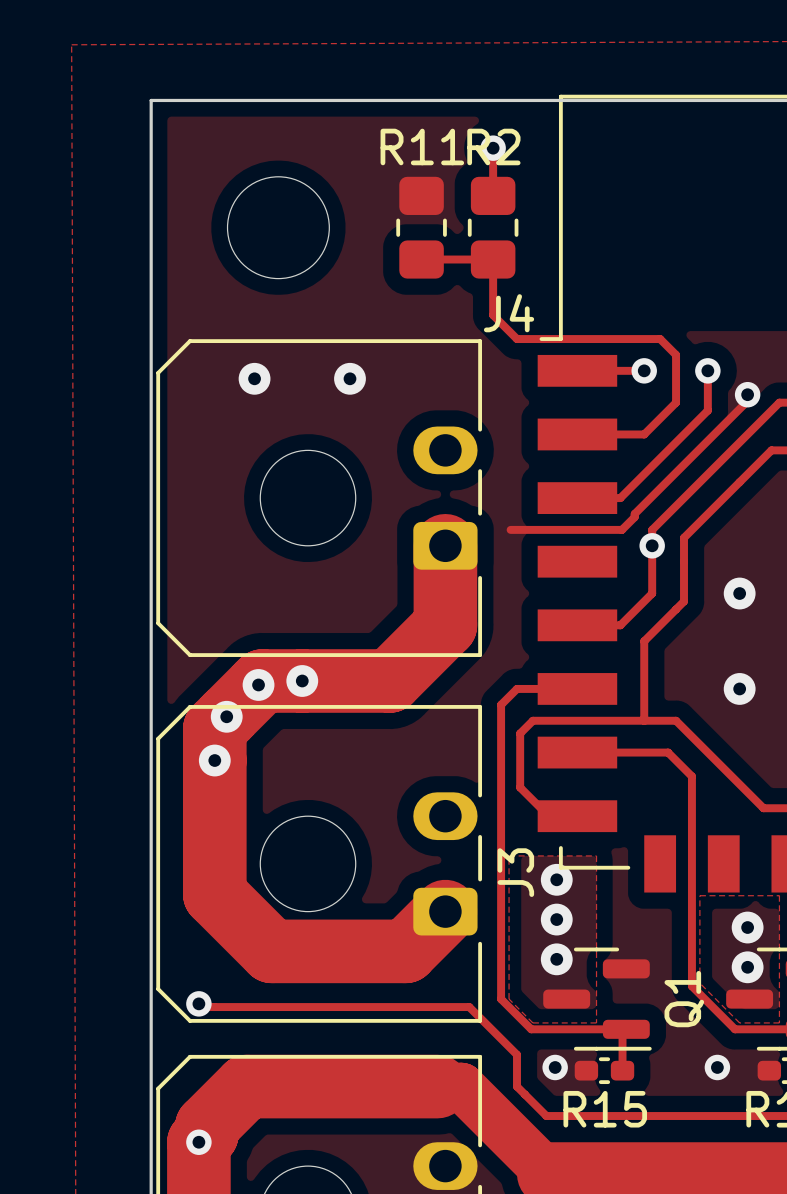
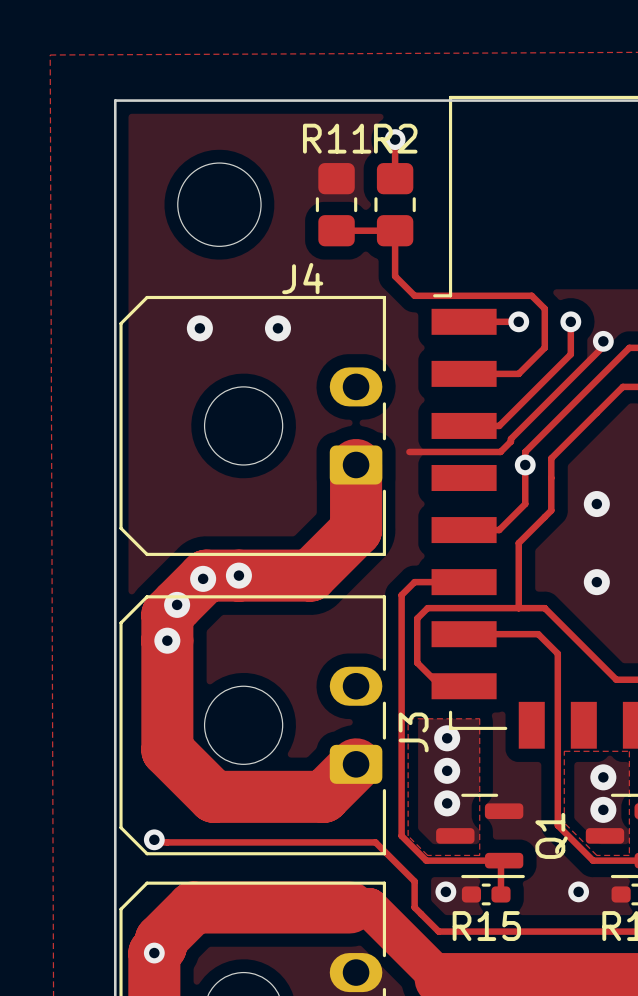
J4 name position: J4 (509, 313) -> J4 (302, 278)

